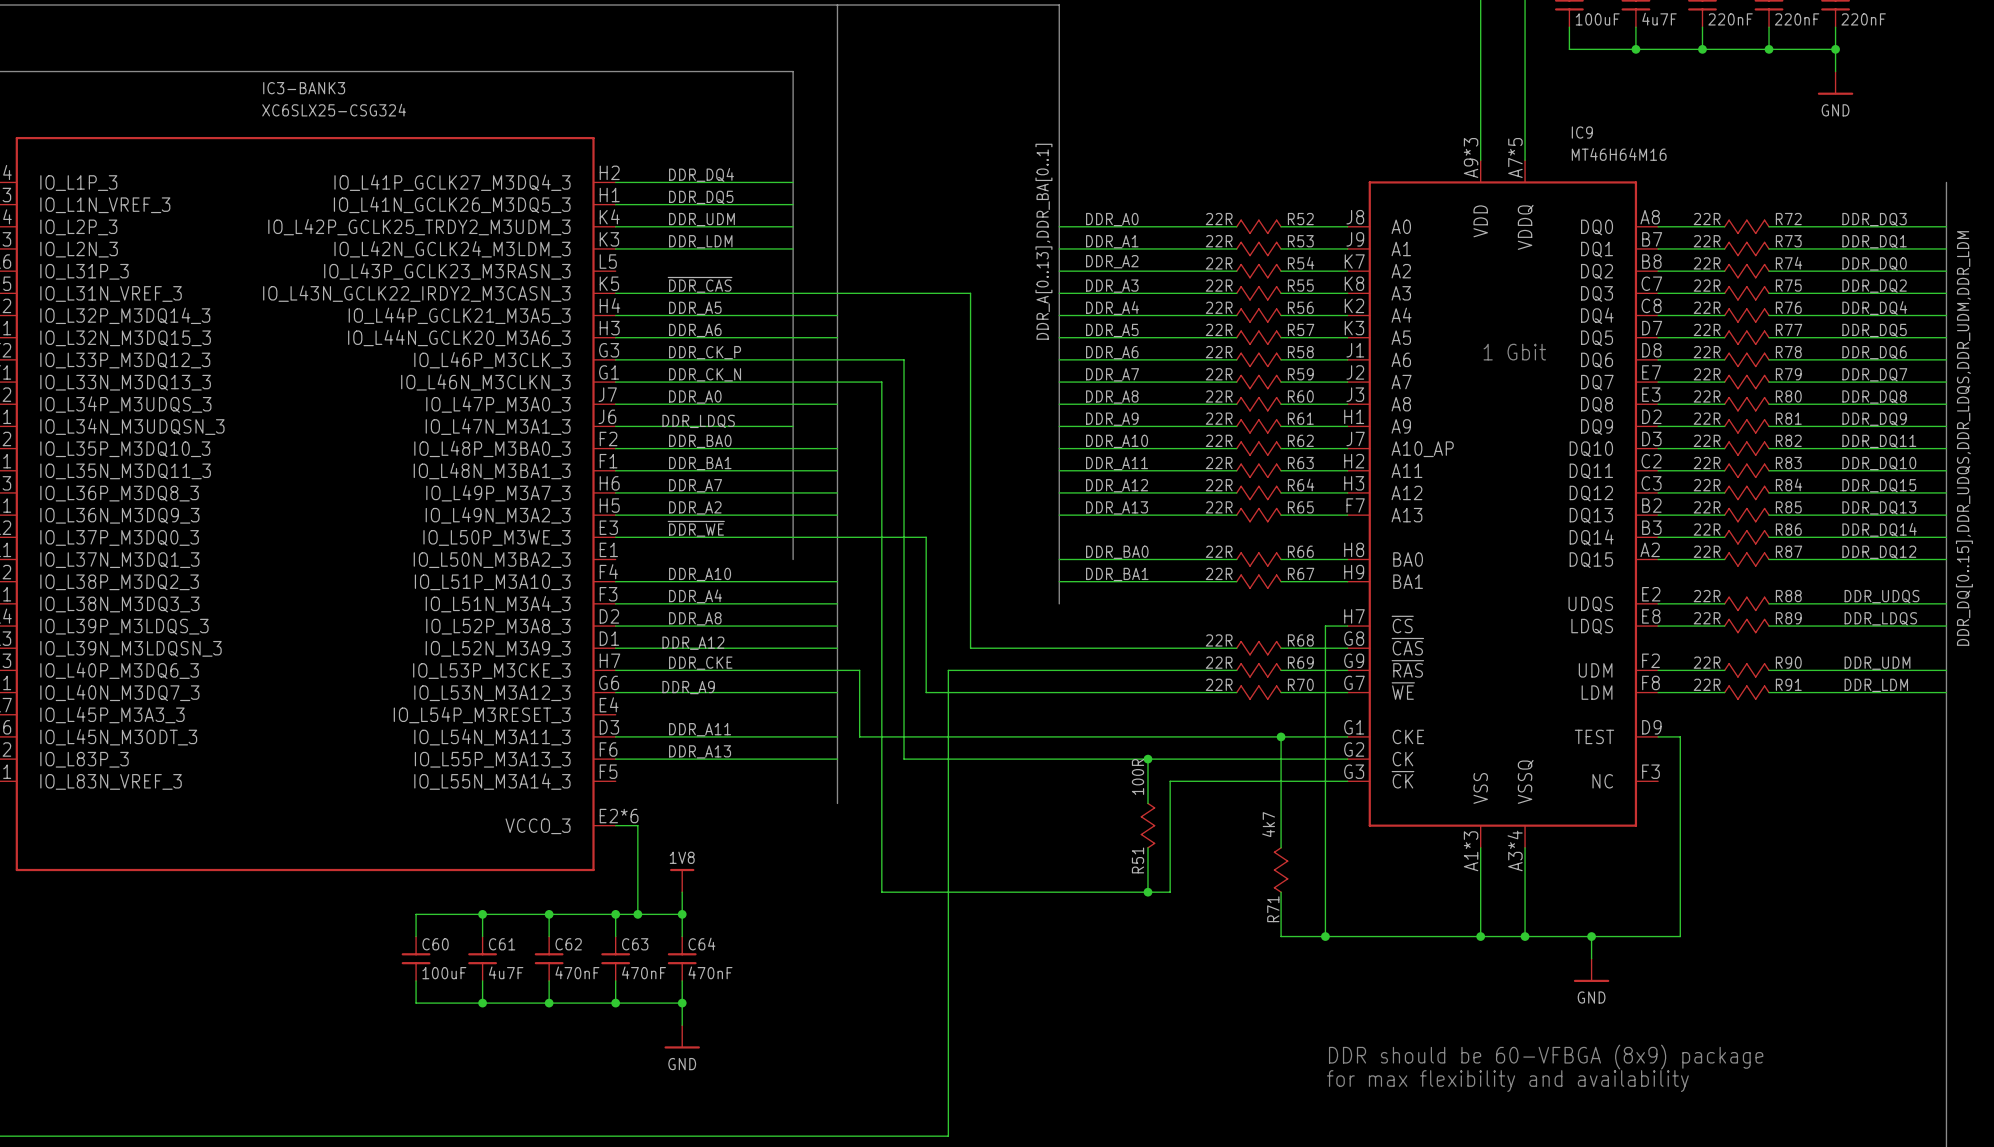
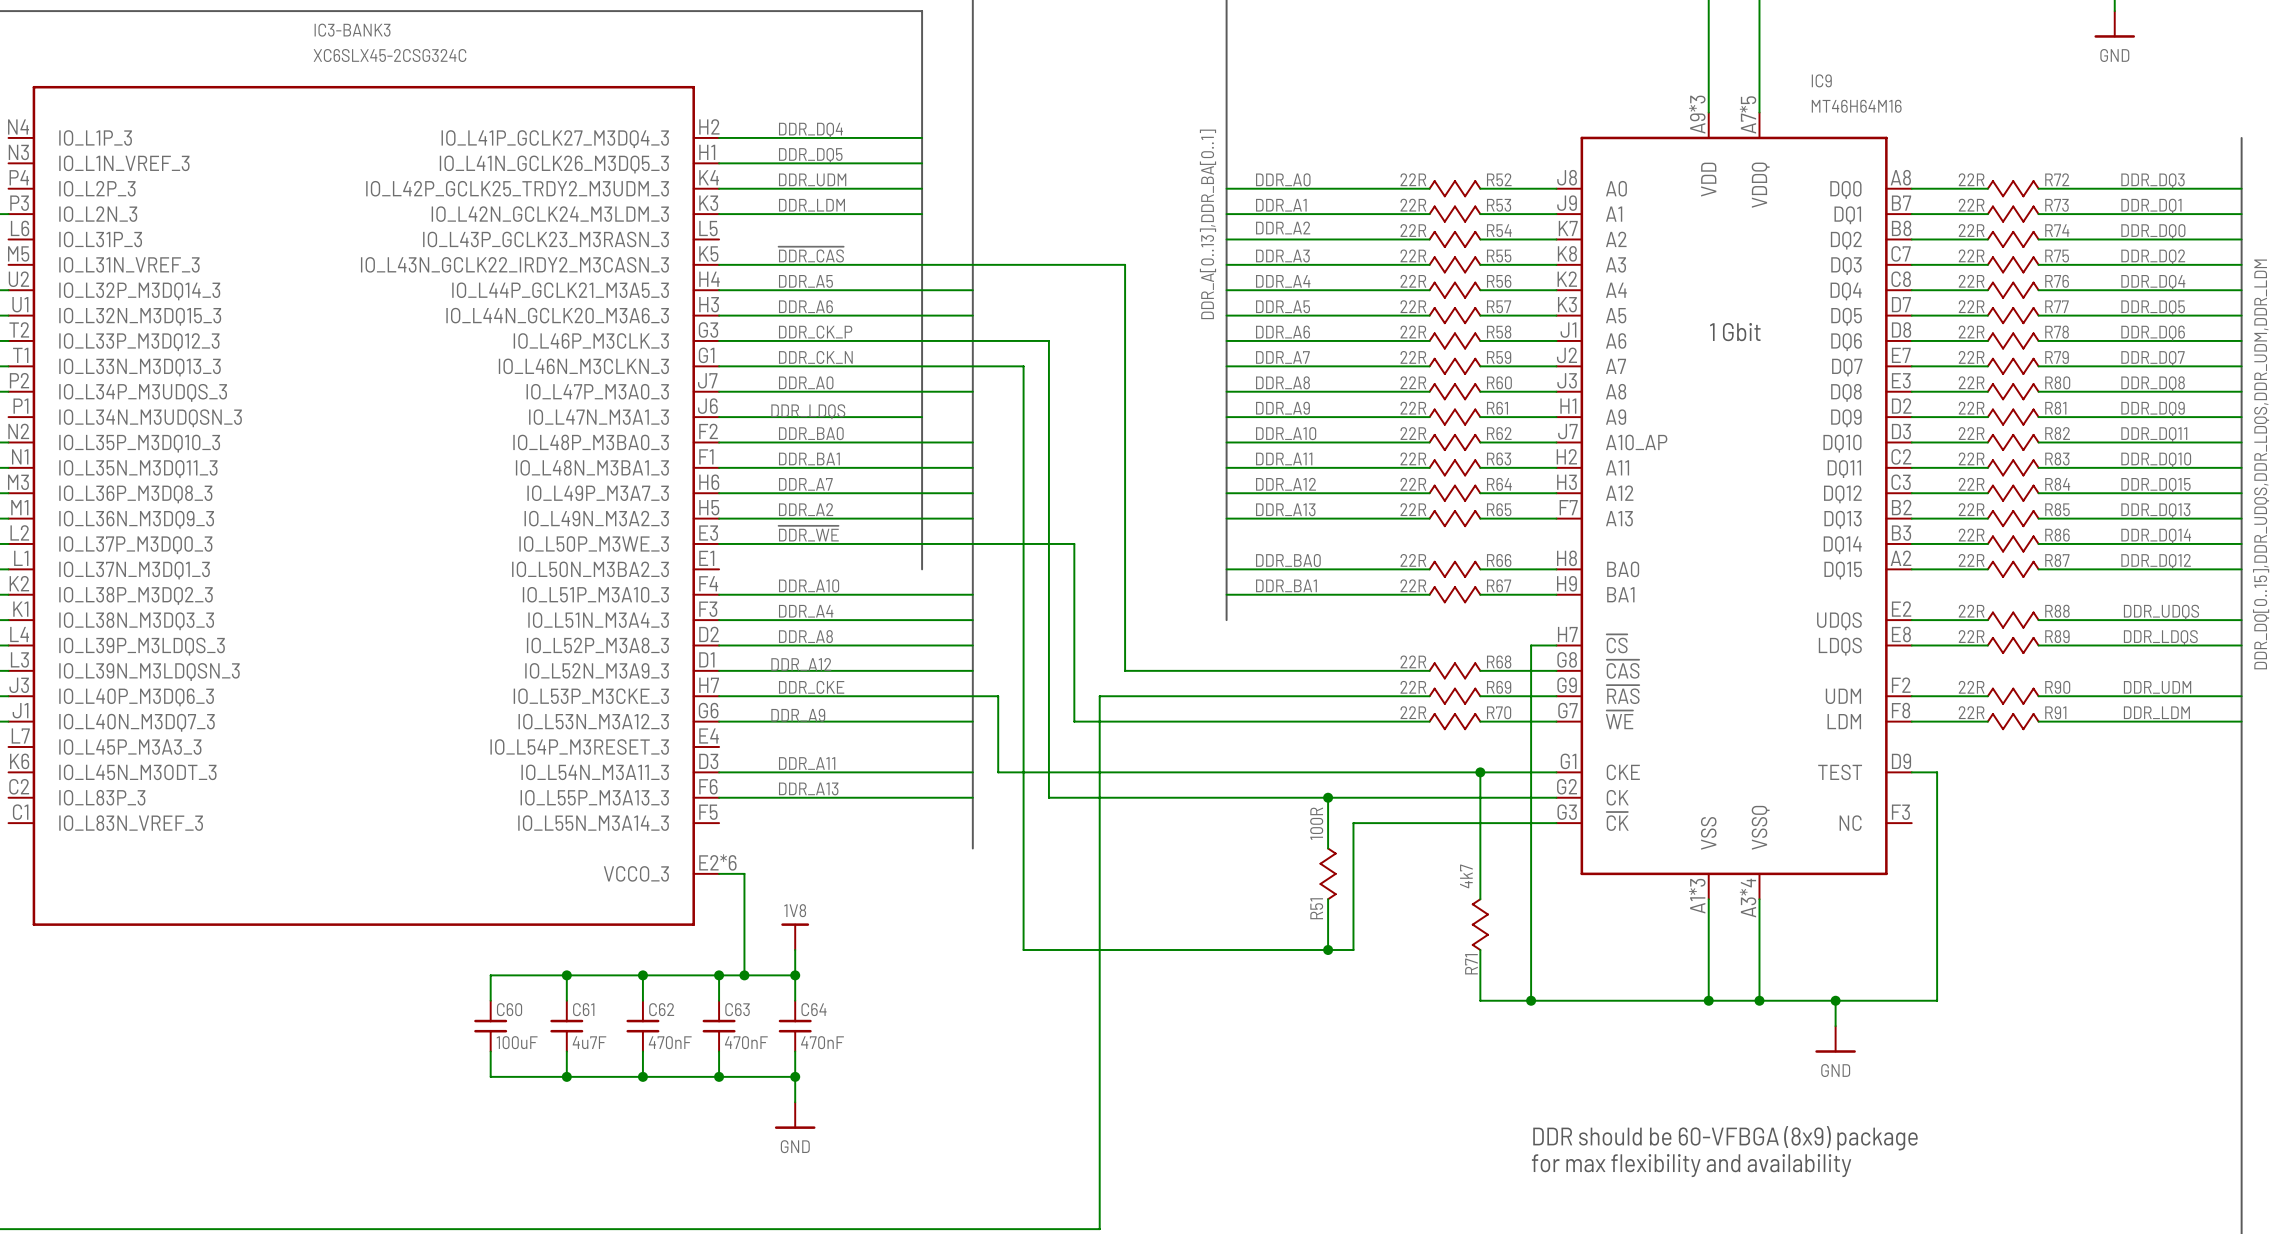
IC3-BANK3 value: XC6SLX25-CSG324 (334, 110) -> XC6SLX45-2CSG324C (389, 55)

